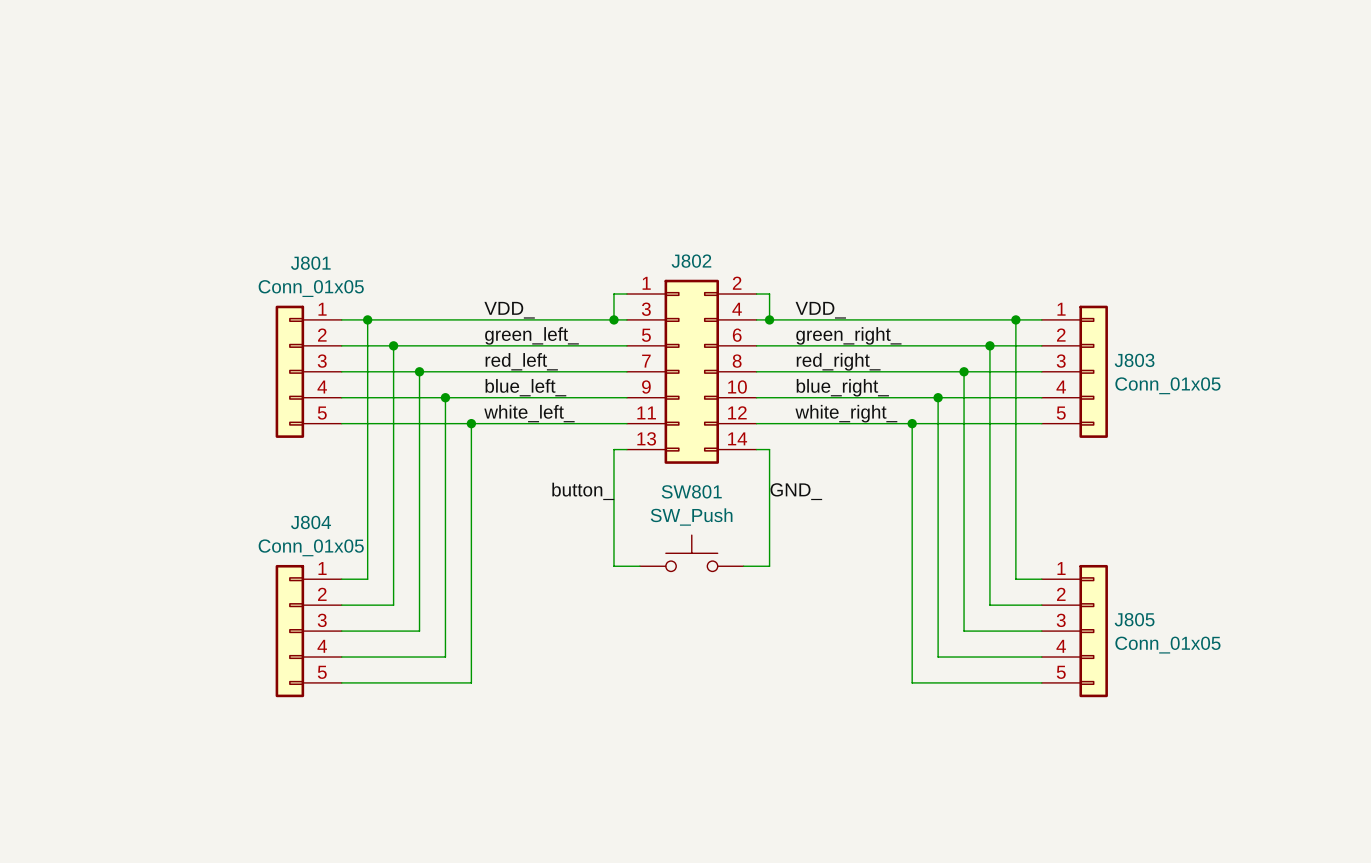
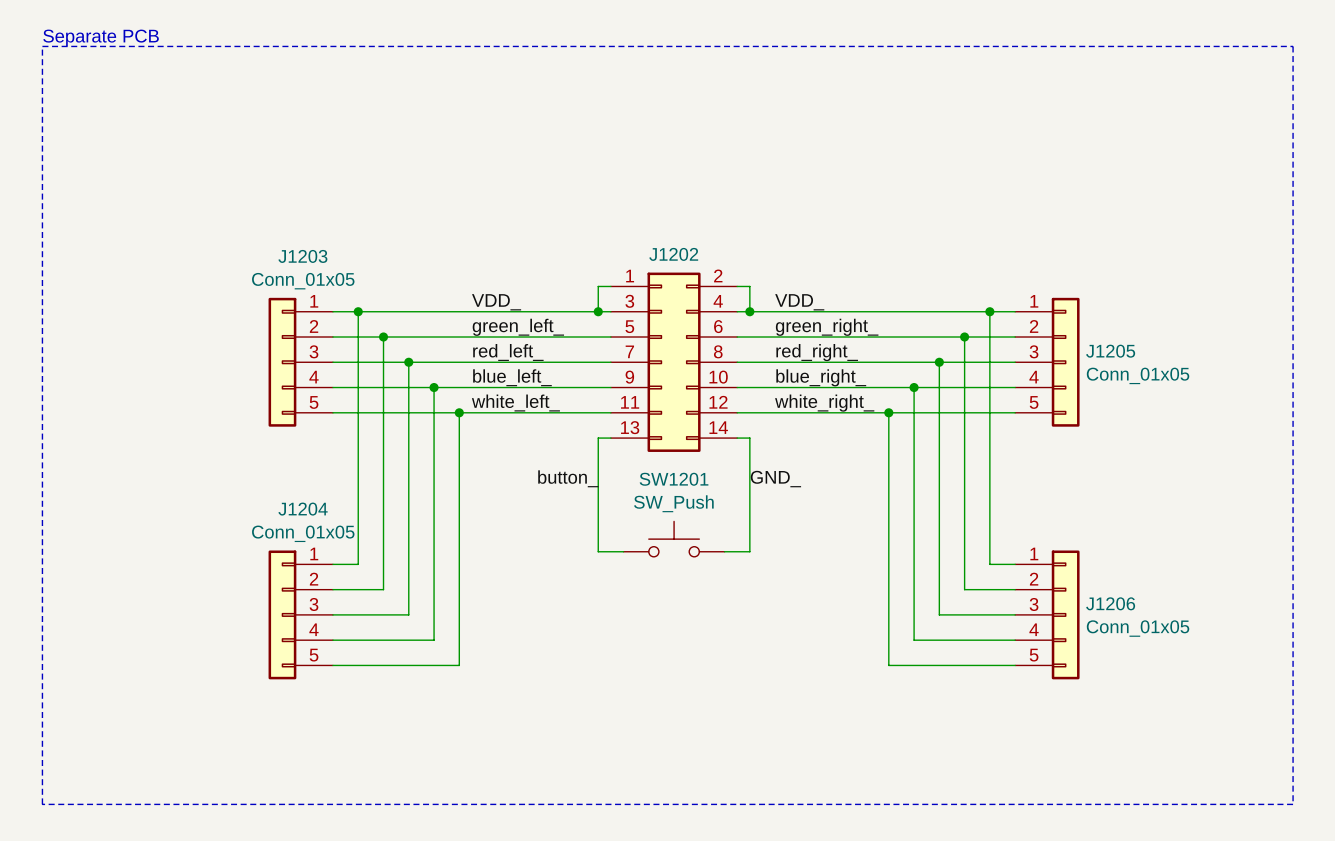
text: none -> Separate PCB (101, 37)
line: none -> (42, 46) (1293, 46) (1293, 804) (42, 804) (42, 46)
J802 name: J802 (691, 261) -> J1202 (673, 254)
J801 name: J801 (310, 263) -> J1203 (302, 256)
J803 name: J803 (1134, 360) -> J1205 (1110, 351)
SW801 name: SW801 (691, 491) -> SW1201 (674, 479)
J804 name: J804 (311, 522) -> J1204 (303, 509)
J805 name: J805 (1134, 619) -> J1206 (1110, 603)

